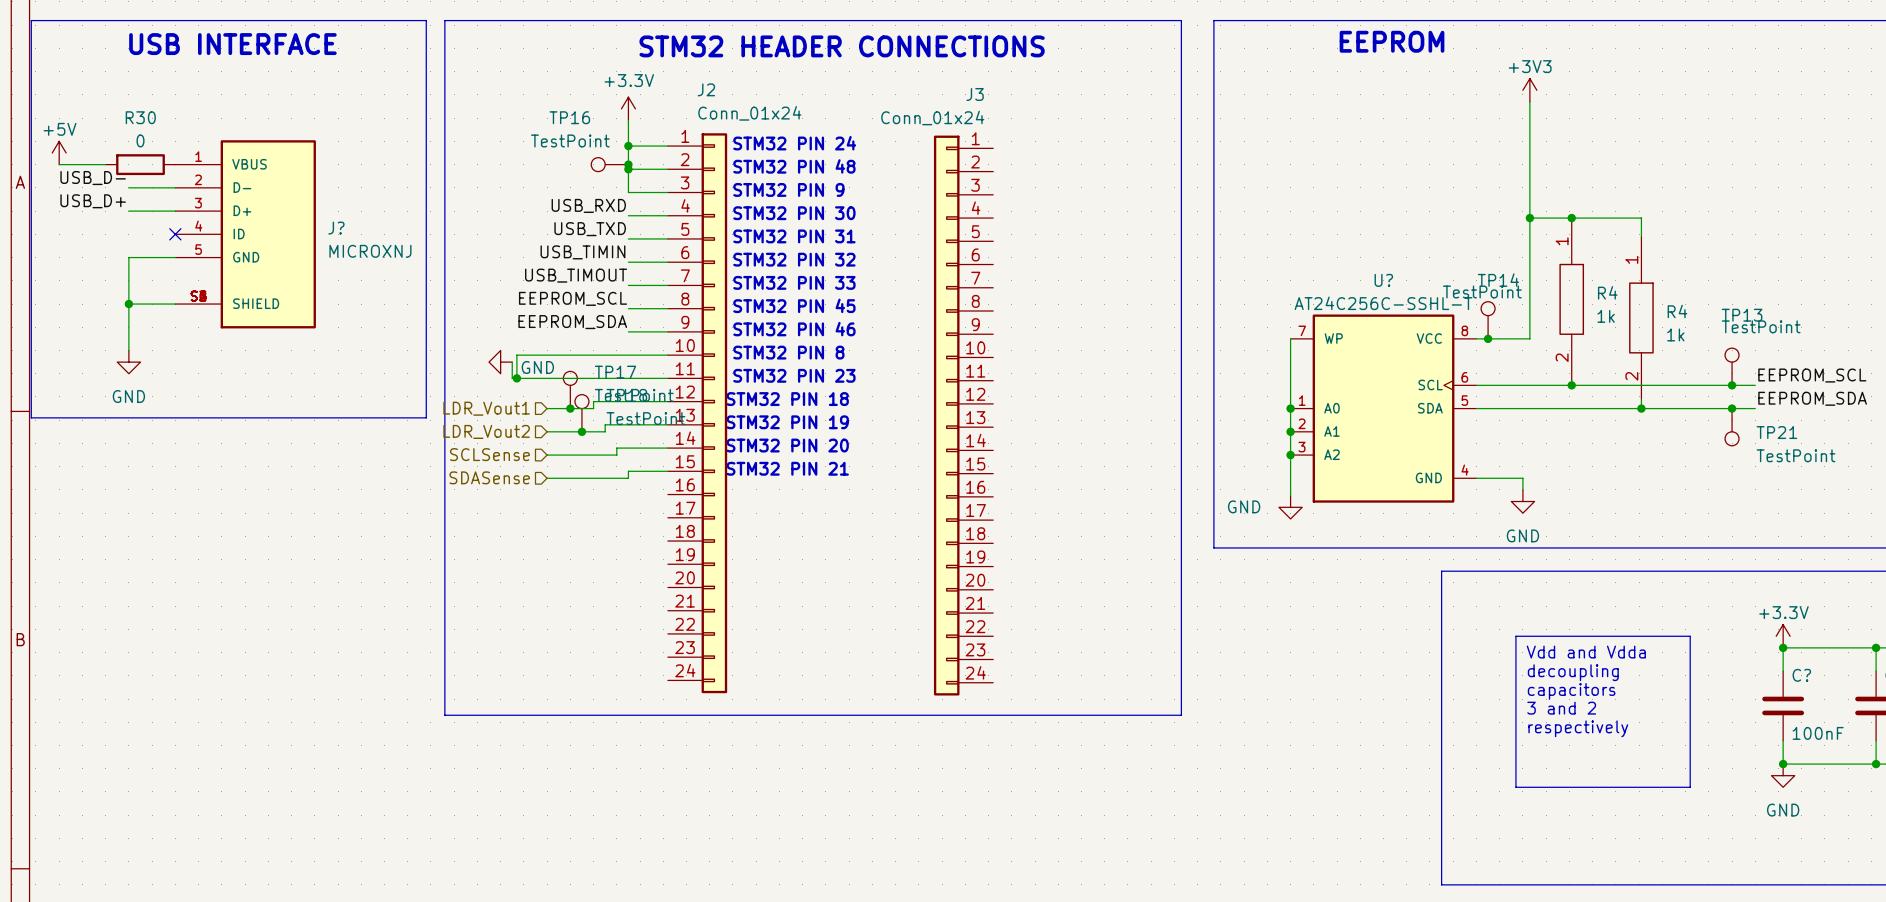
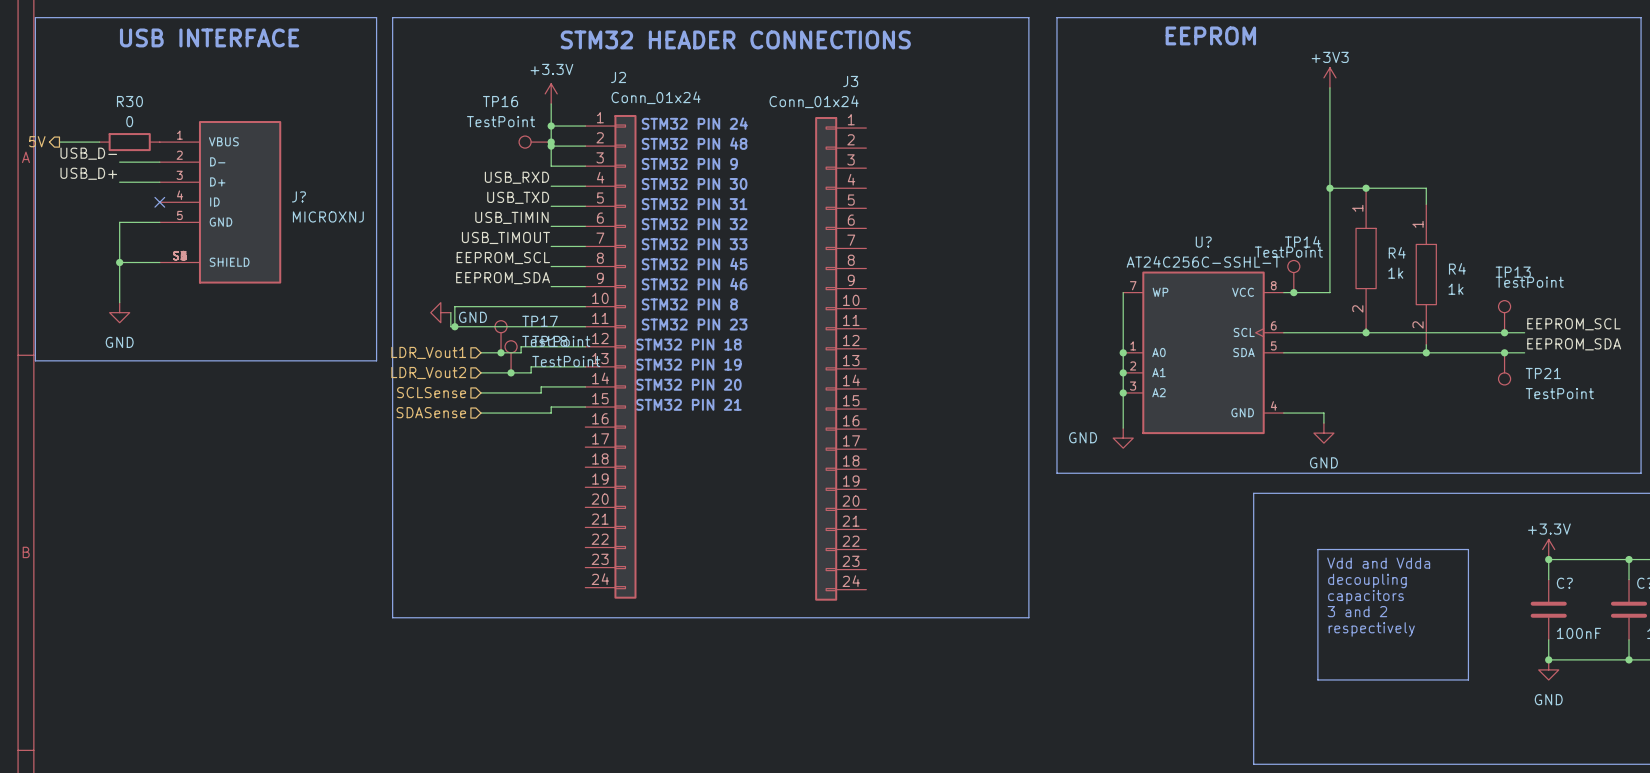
power symbol: +5V (59, 153) -> none
hierarchical label: none -> 5V (37, 141)

